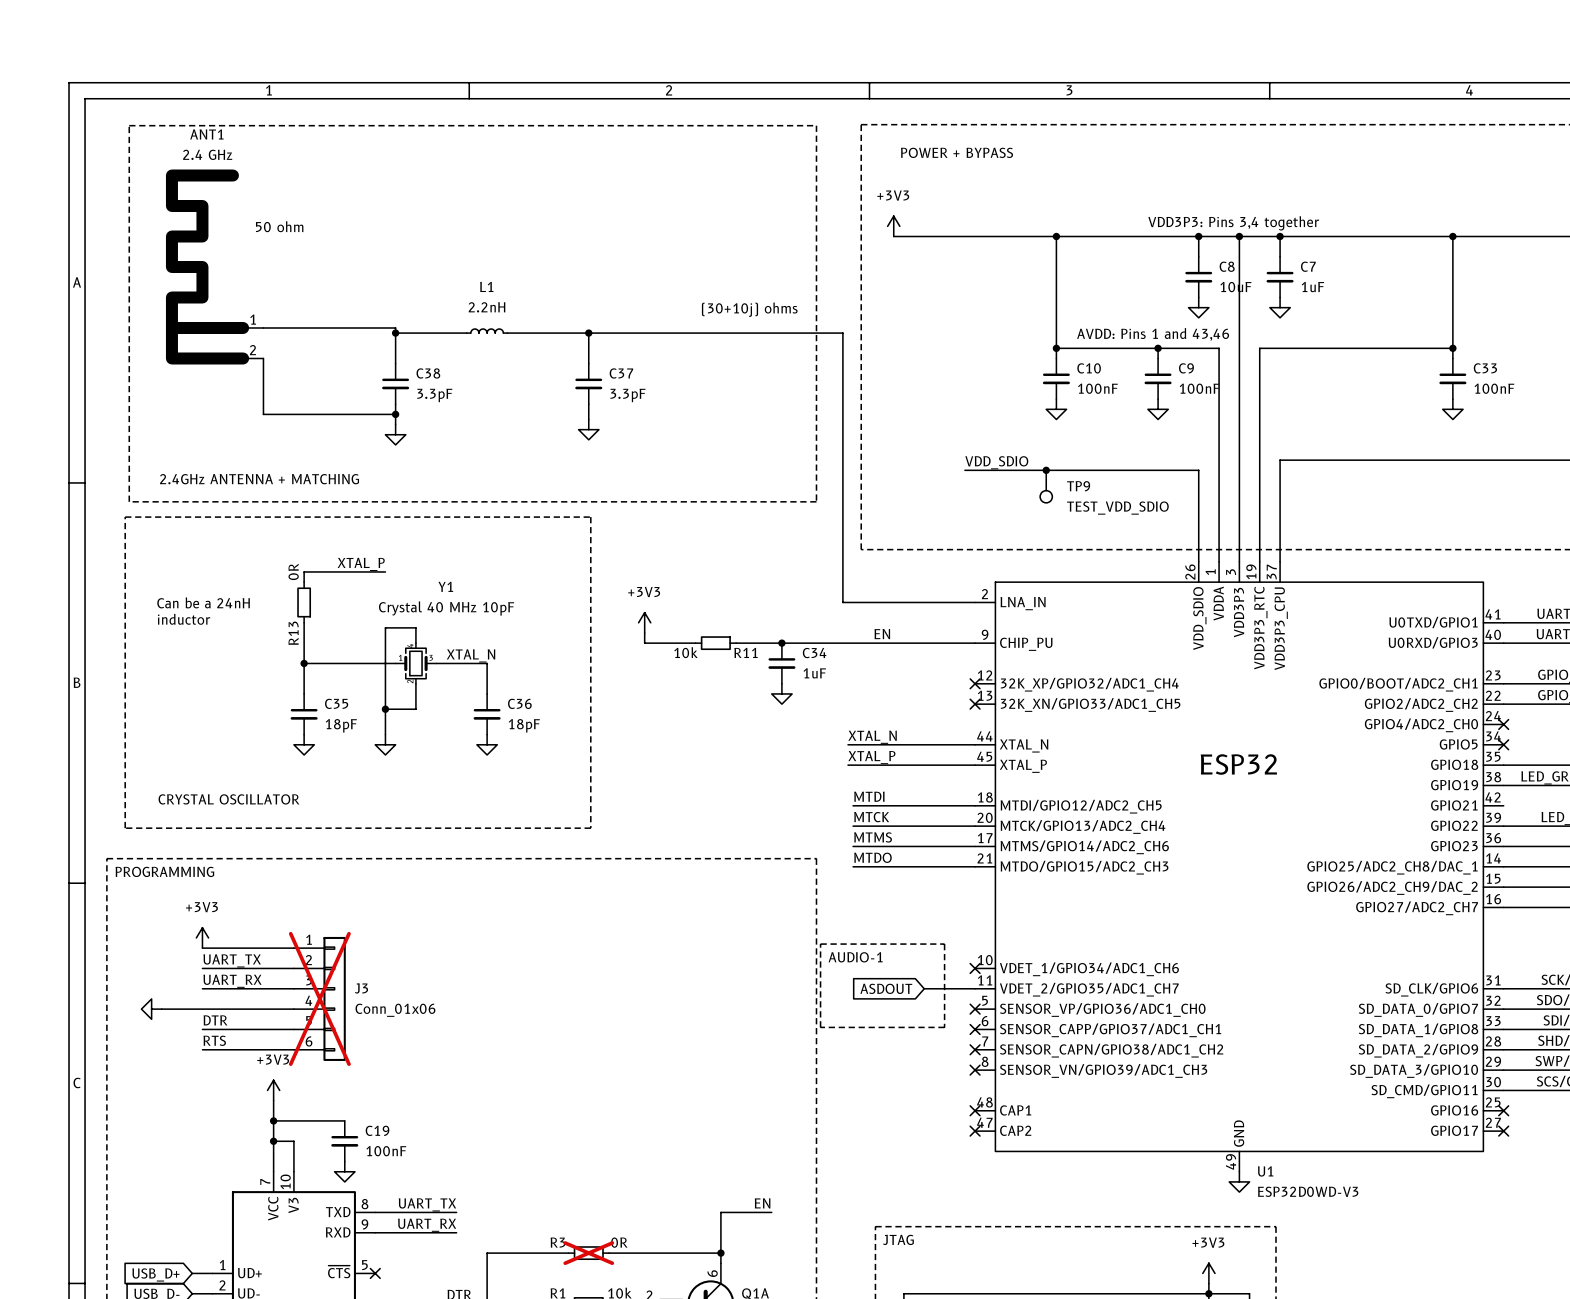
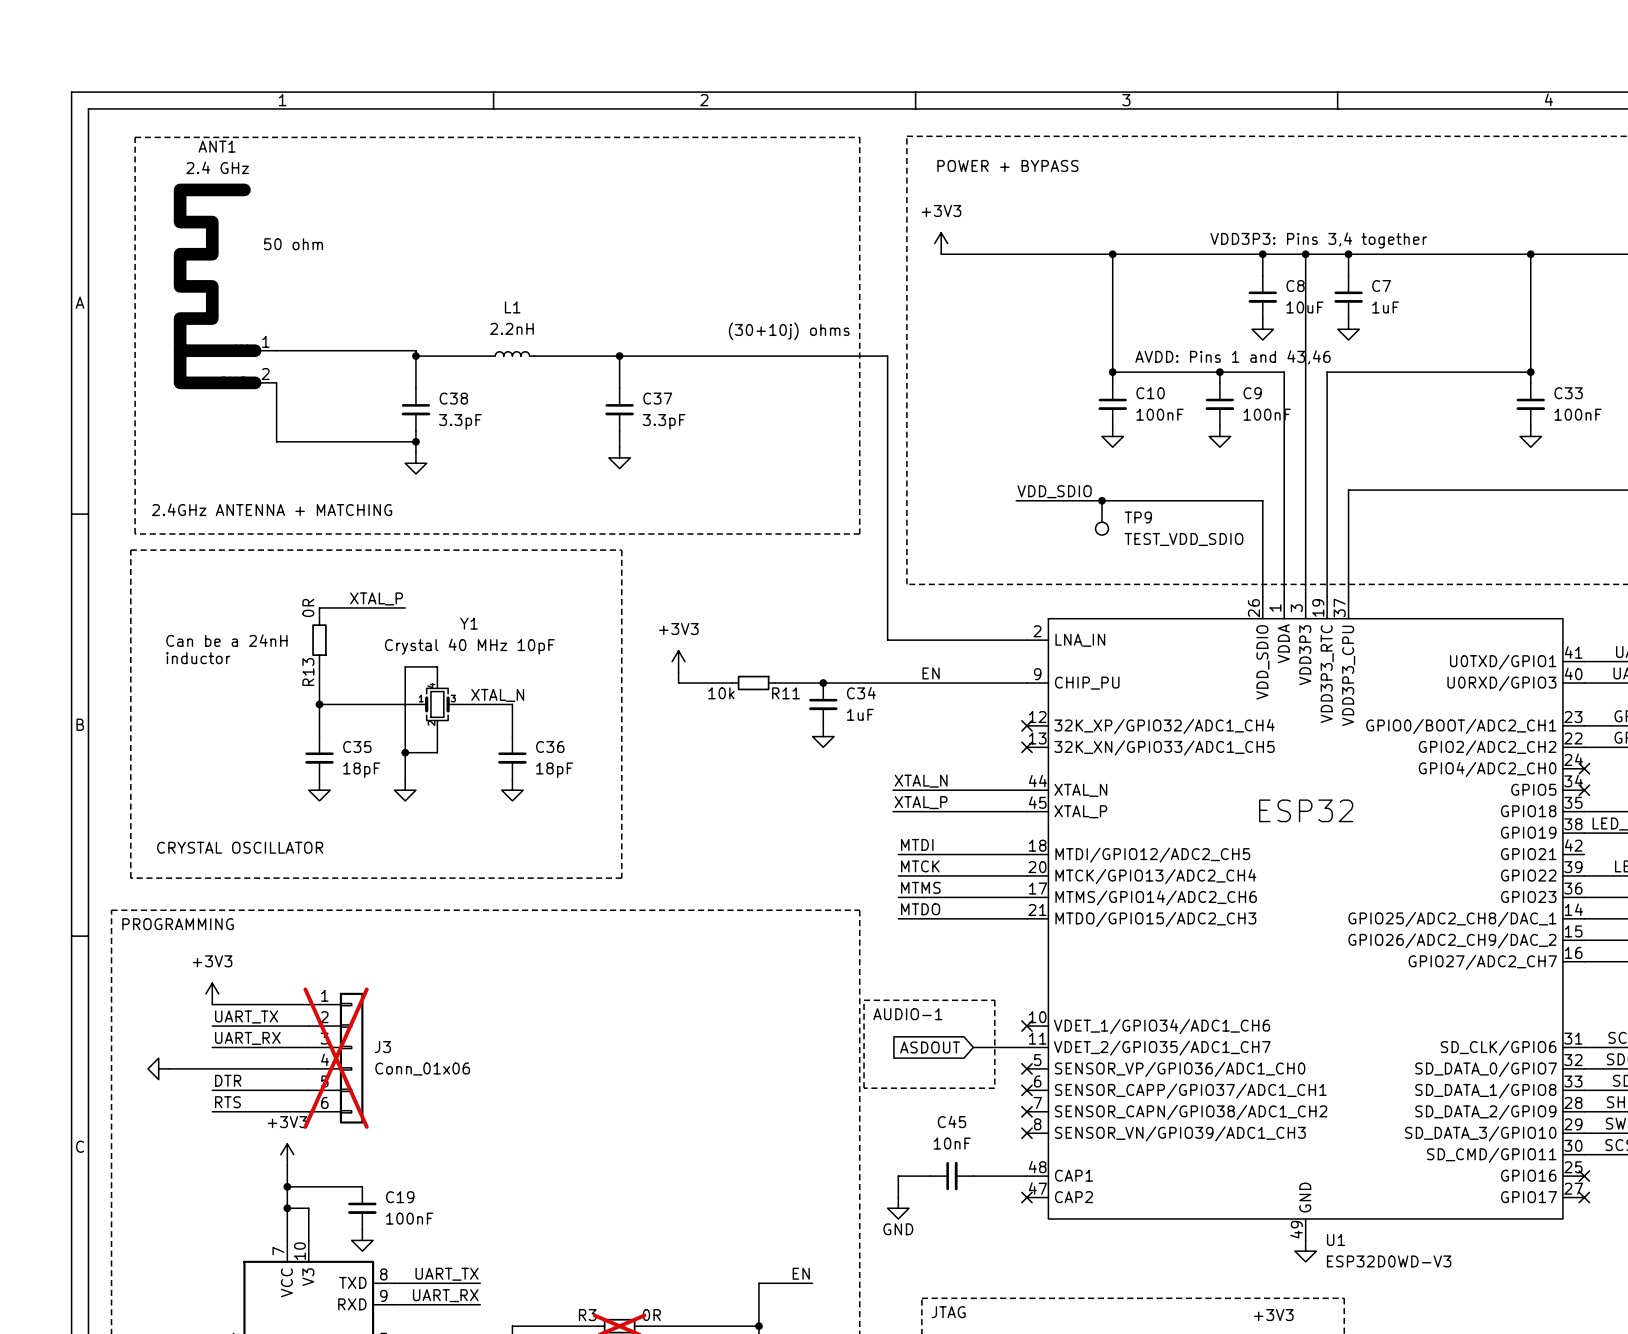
wire: none -> (930, 1176) (898, 1176) (898, 1197)
C45: none -> 10nF (951, 1176)
wire: none -> (973, 1176) (1026, 1176)
no-connect mark: (975, 1110) -> none
power symbol: none -> GND (898, 1208)

